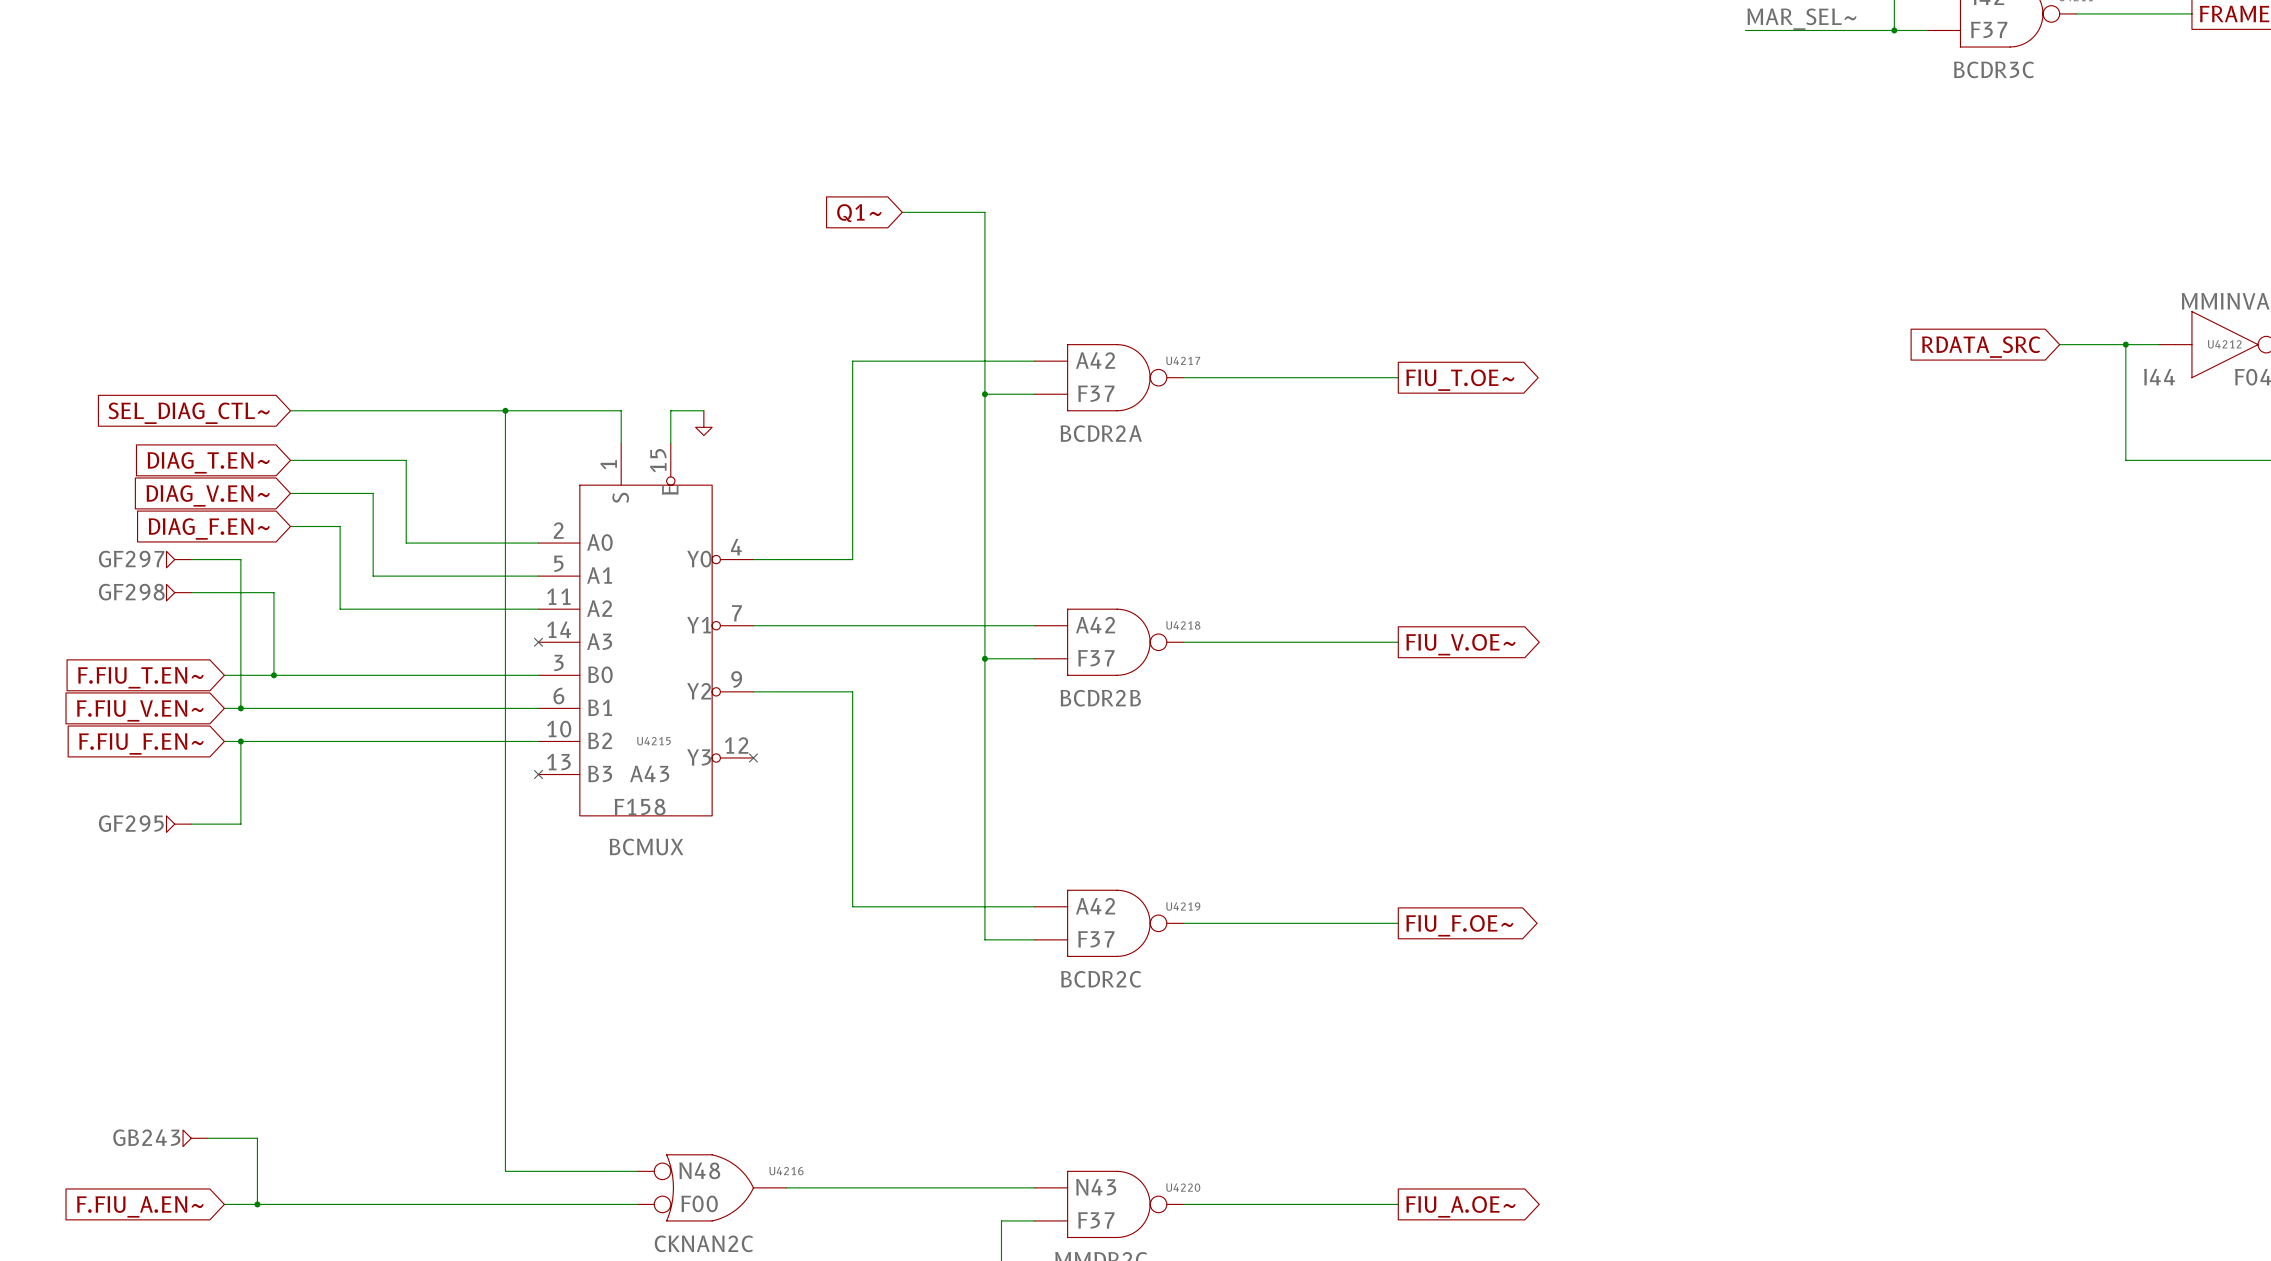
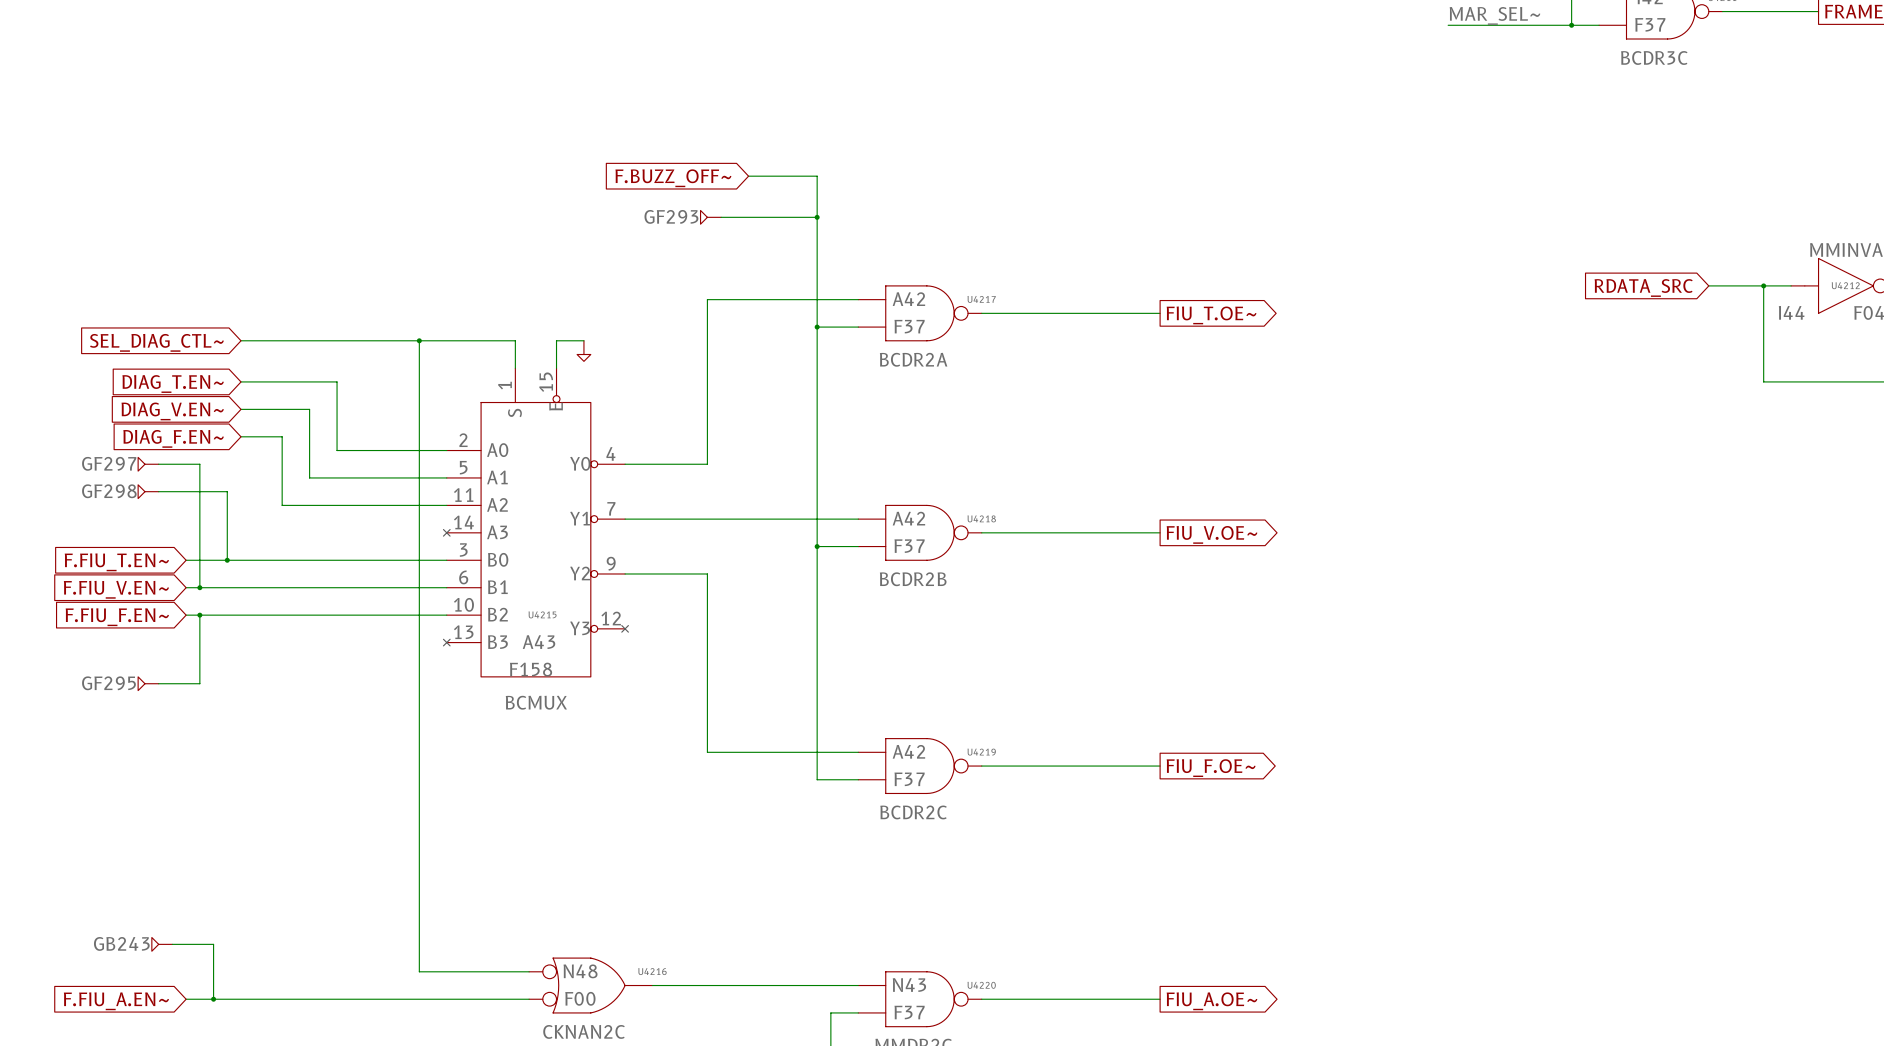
global label: Q1~ (859, 213) -> F.BUZZ_OFF~ (673, 178)
GF293: none -> (710, 217)
wire: none -> (721, 217) (817, 217)
junction: none -> (817, 217)

